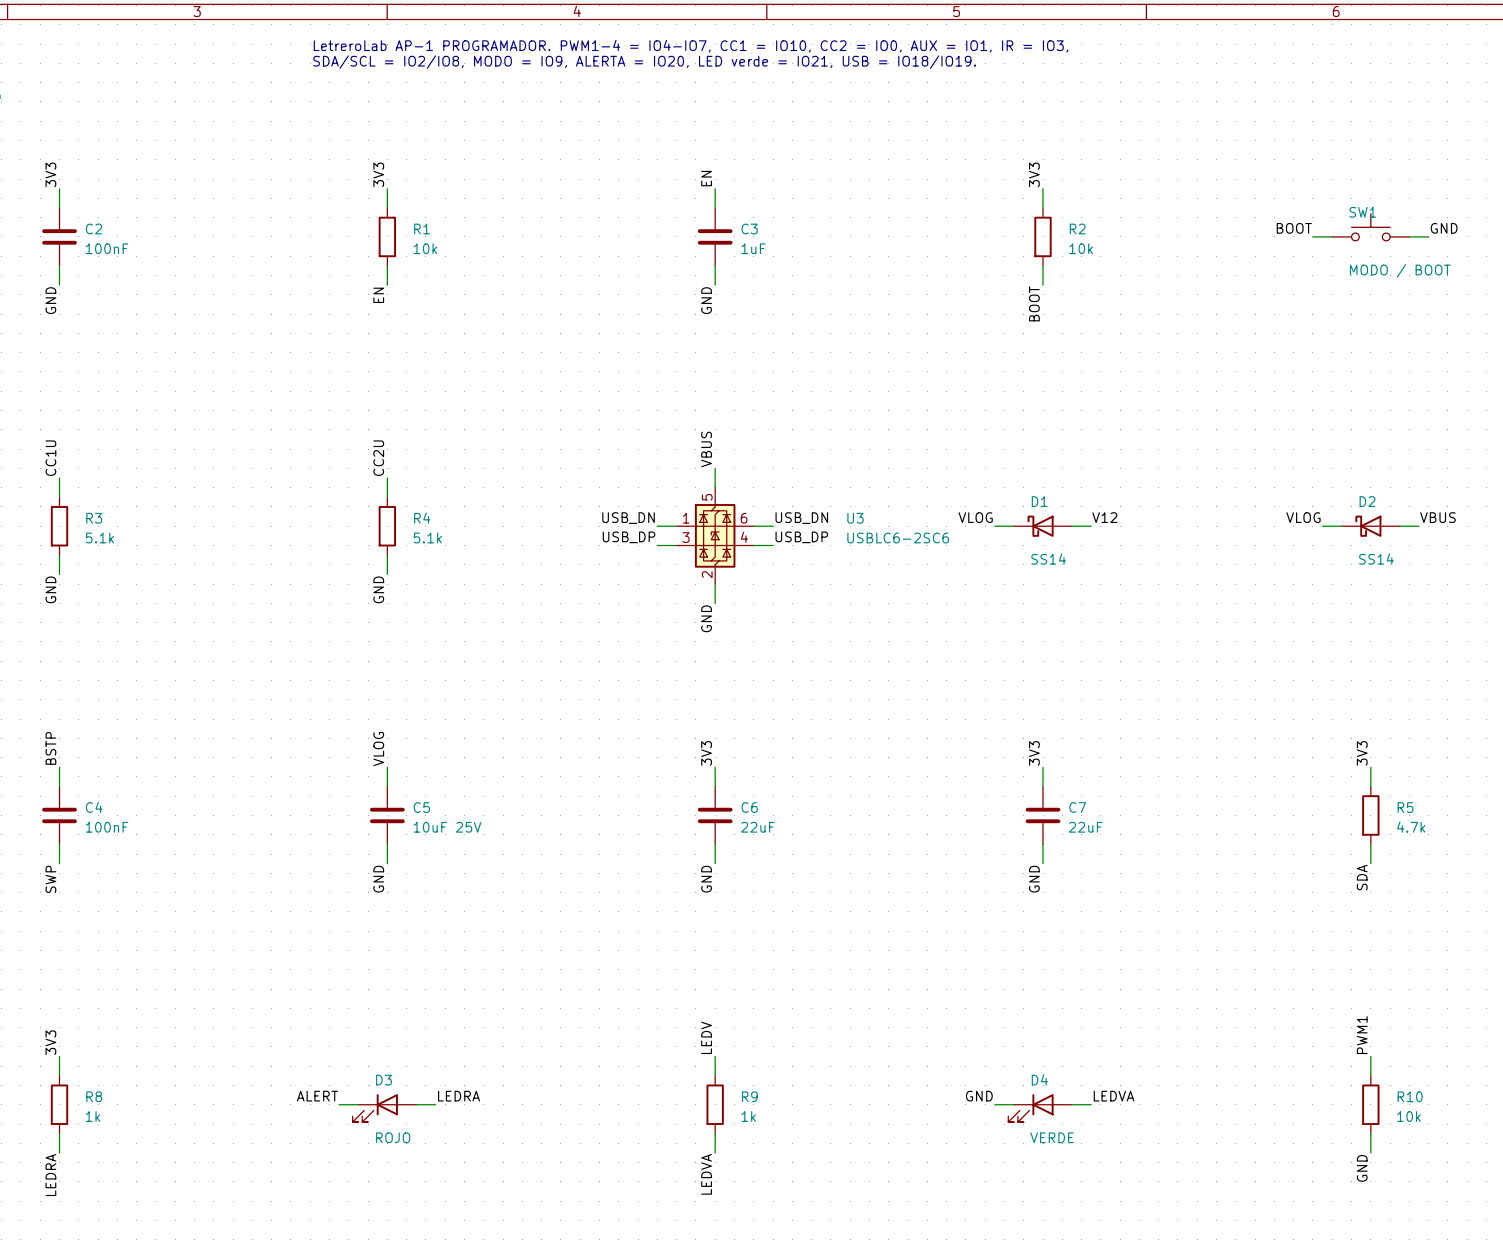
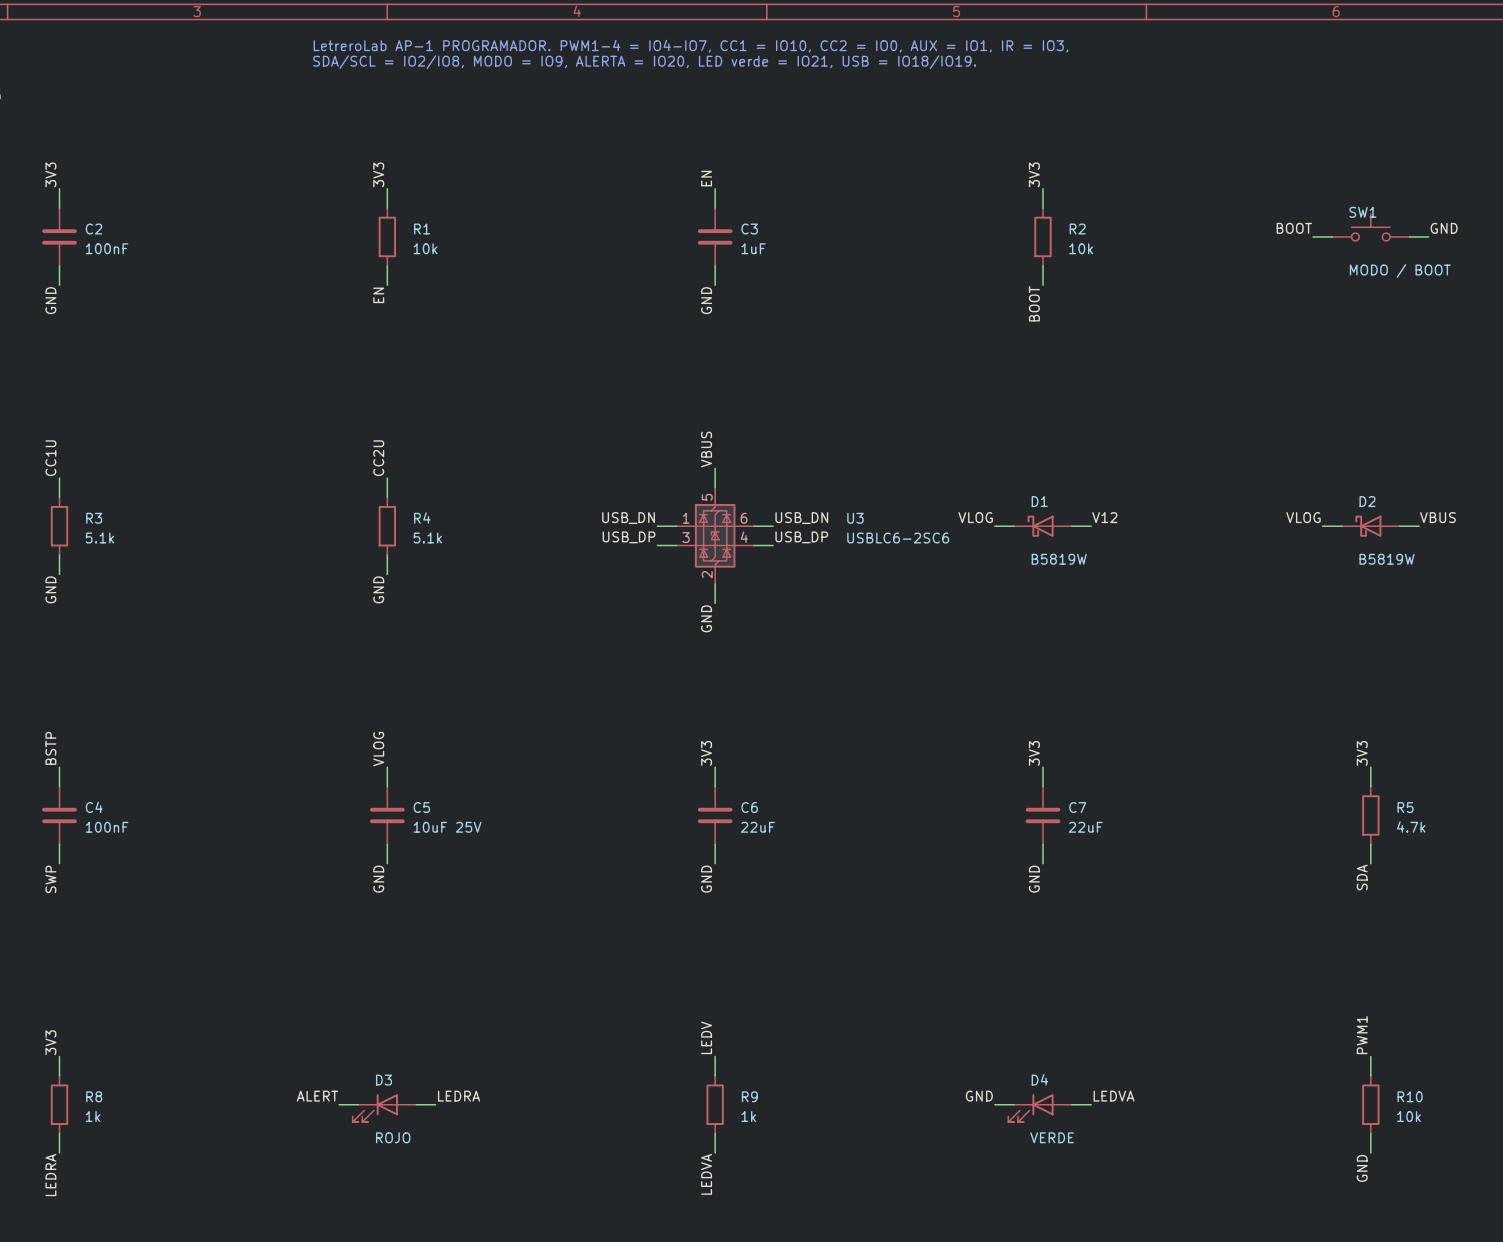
D1 value: SS14 (1048, 559) -> B5819W (1059, 559)
D2 value: SS14 (1376, 559) -> B5819W (1387, 559)

